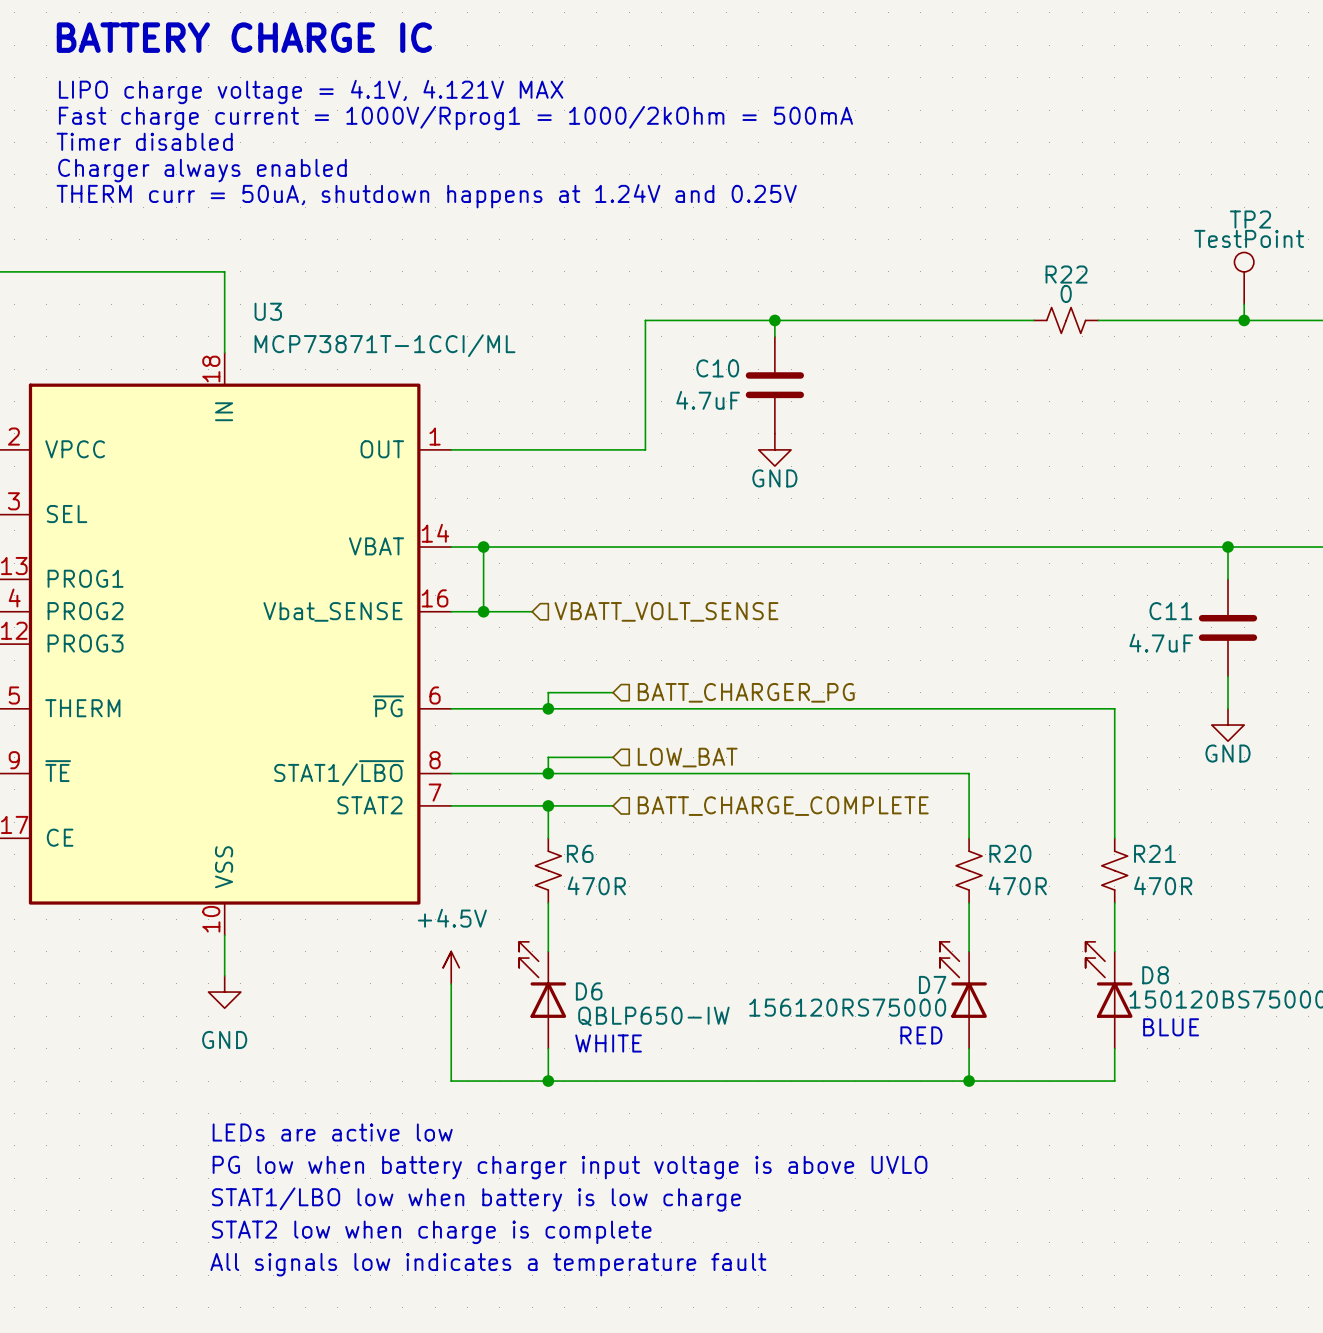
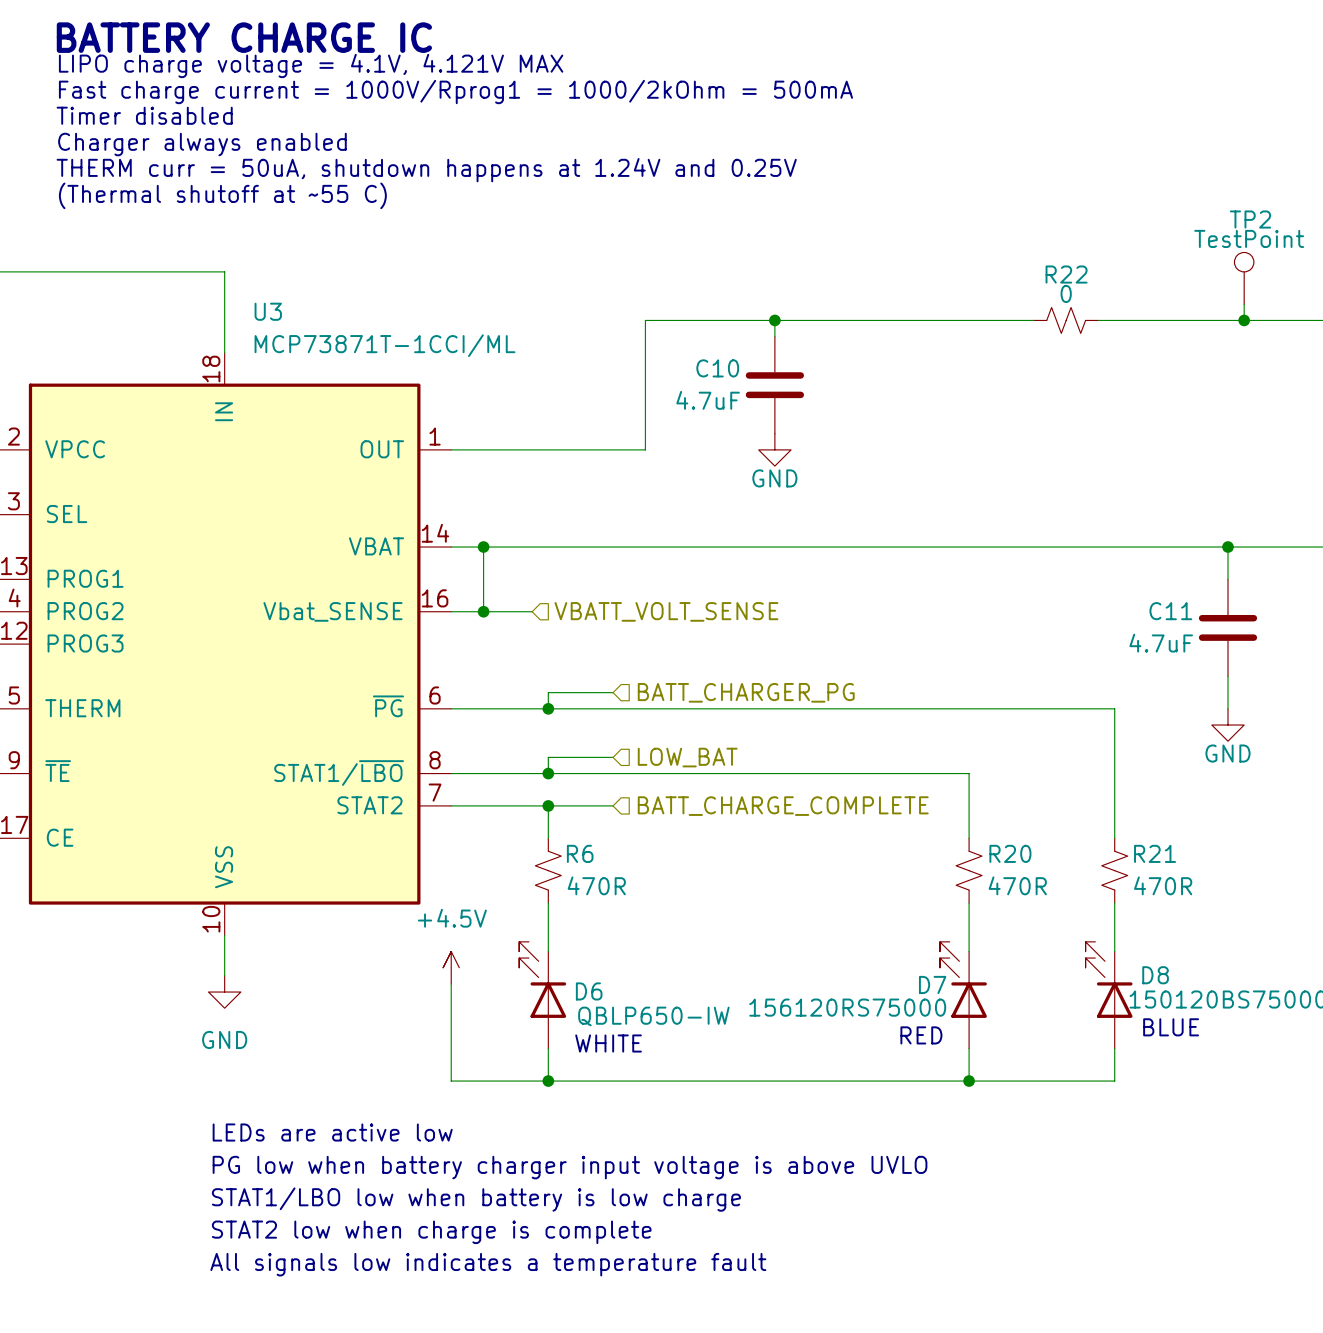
text: none -> LIPO charge voltage = 4.1V, 4.121V MAX (311, 65)
text: LIPO charge voltage = 4.1V, 4.121V MAX (311, 92) -> Fast charge current = 1000V/Rprog1 = 1000/2kOhm = 500mA (455, 92)
text: Fast charge current = 1000V/Rprog1 = 1000/2kOhm = 500mA (455, 118) -> Timer disabled (144, 115)
text: Timer disabled (144, 141) -> Charger always enabled (202, 144)
text: Charger always enabled (202, 170) -> THERM curr = 50uA, shutdown happens at 1.24V and 0.25V (426, 170)
text: THERM curr = 50uA, shutdown happens at 1.24V and 0.25V (426, 196) -> (Thermal shutoff at ~55 C) (222, 195)

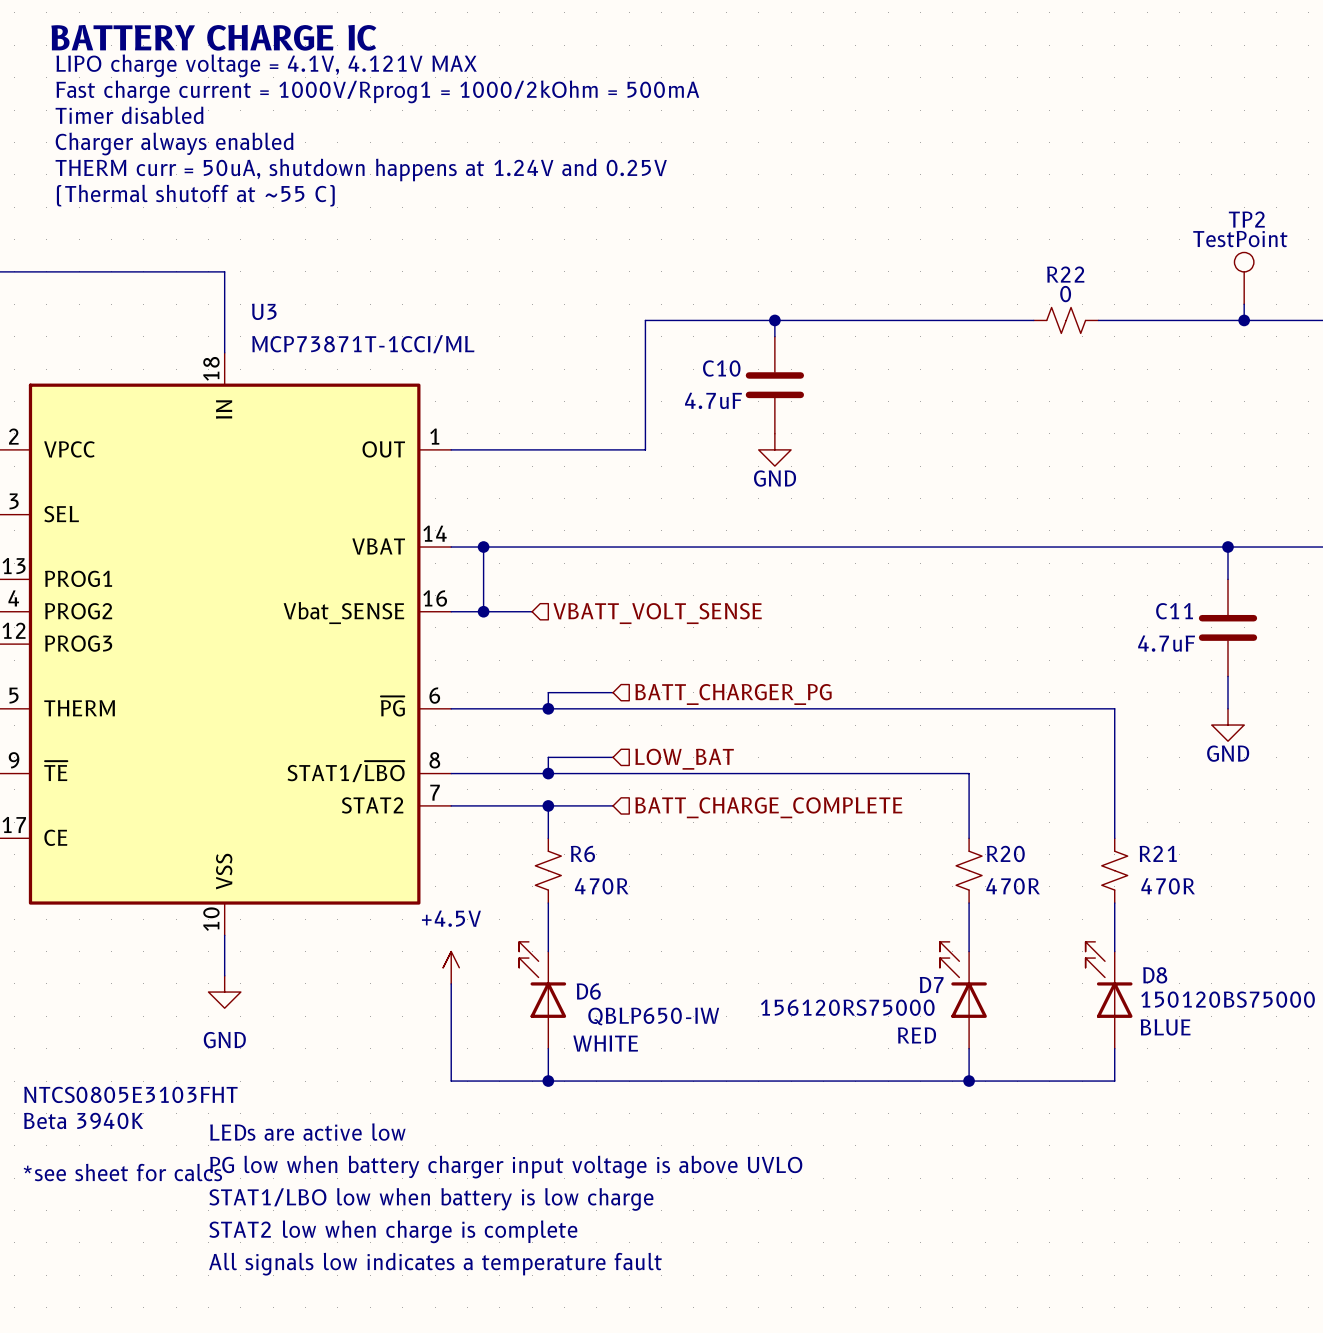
text: none -> NTCS0805E3103FHT (130, 1094)
text: none -> Beta 3940K (83, 1120)
text: none -> *see sheet for calcs (122, 1172)

